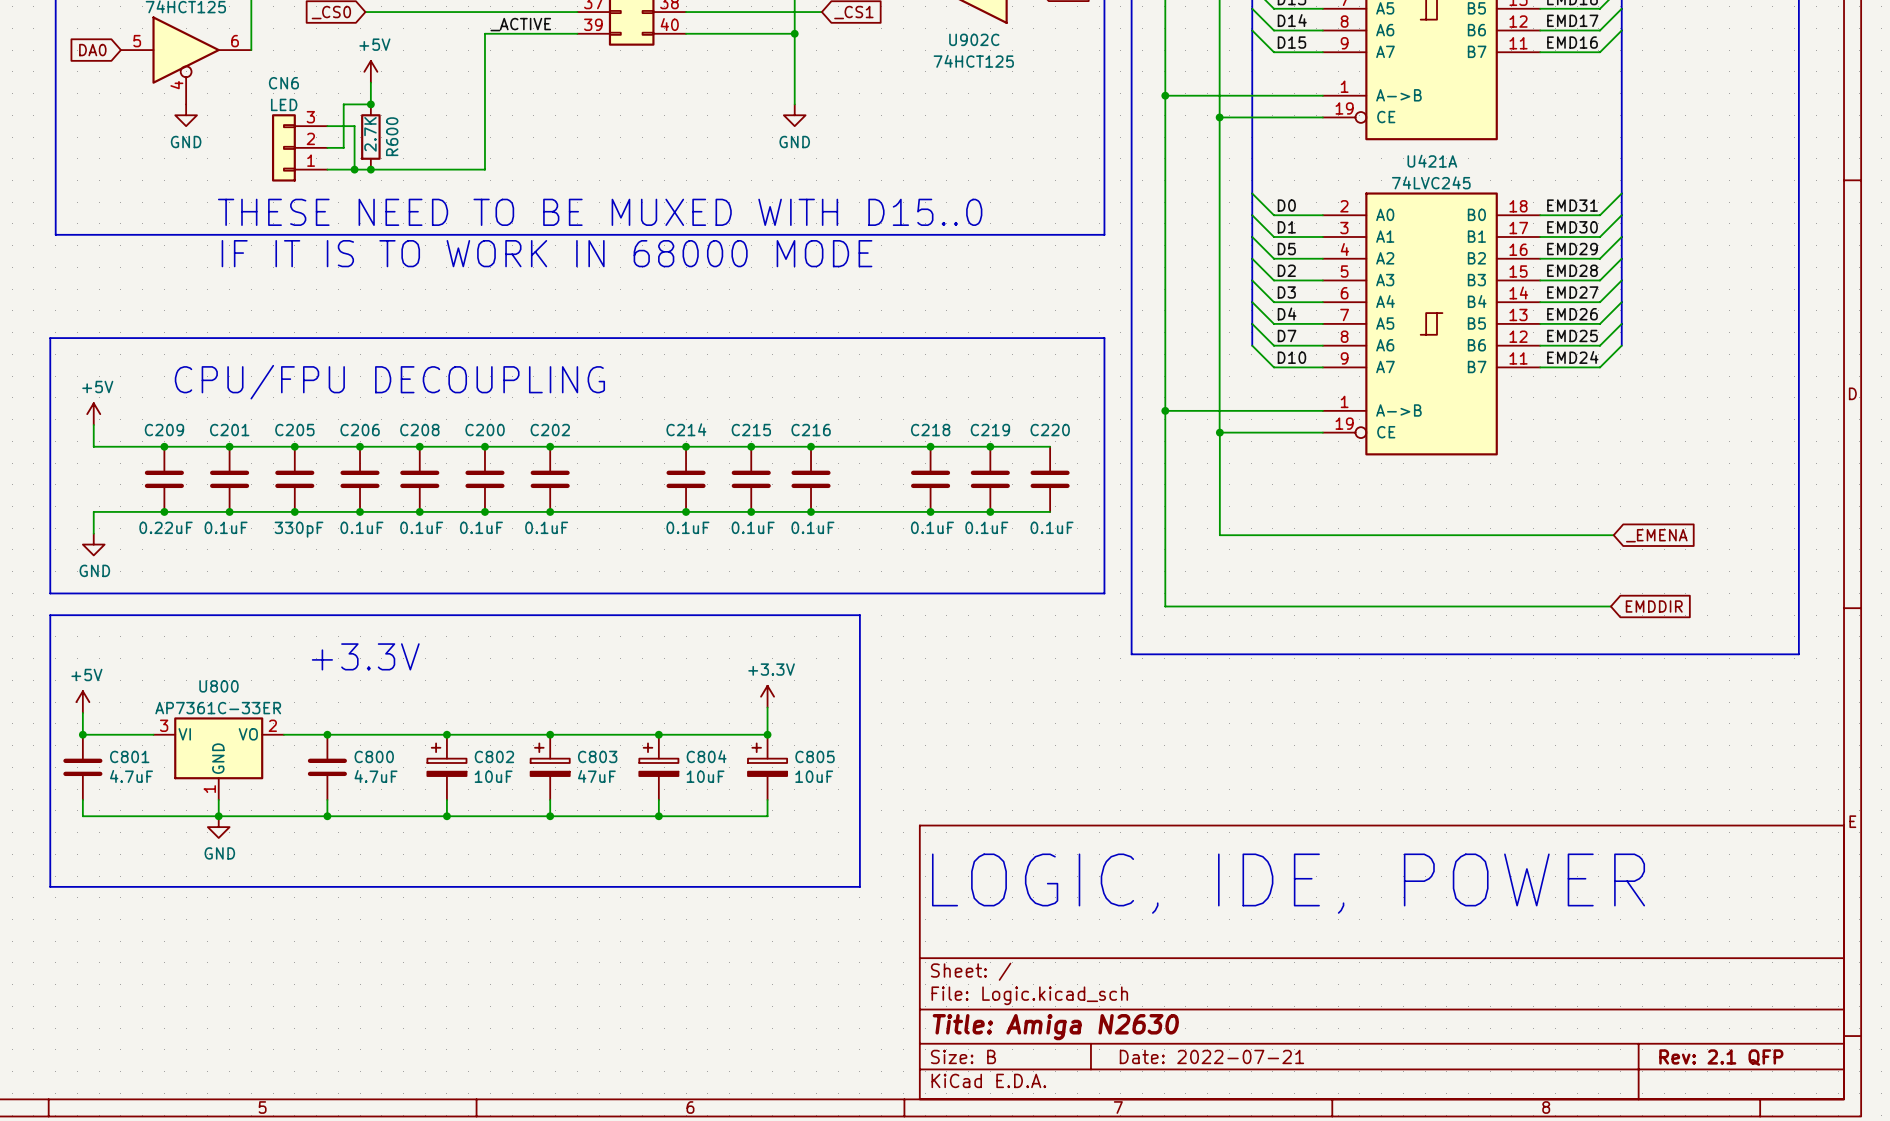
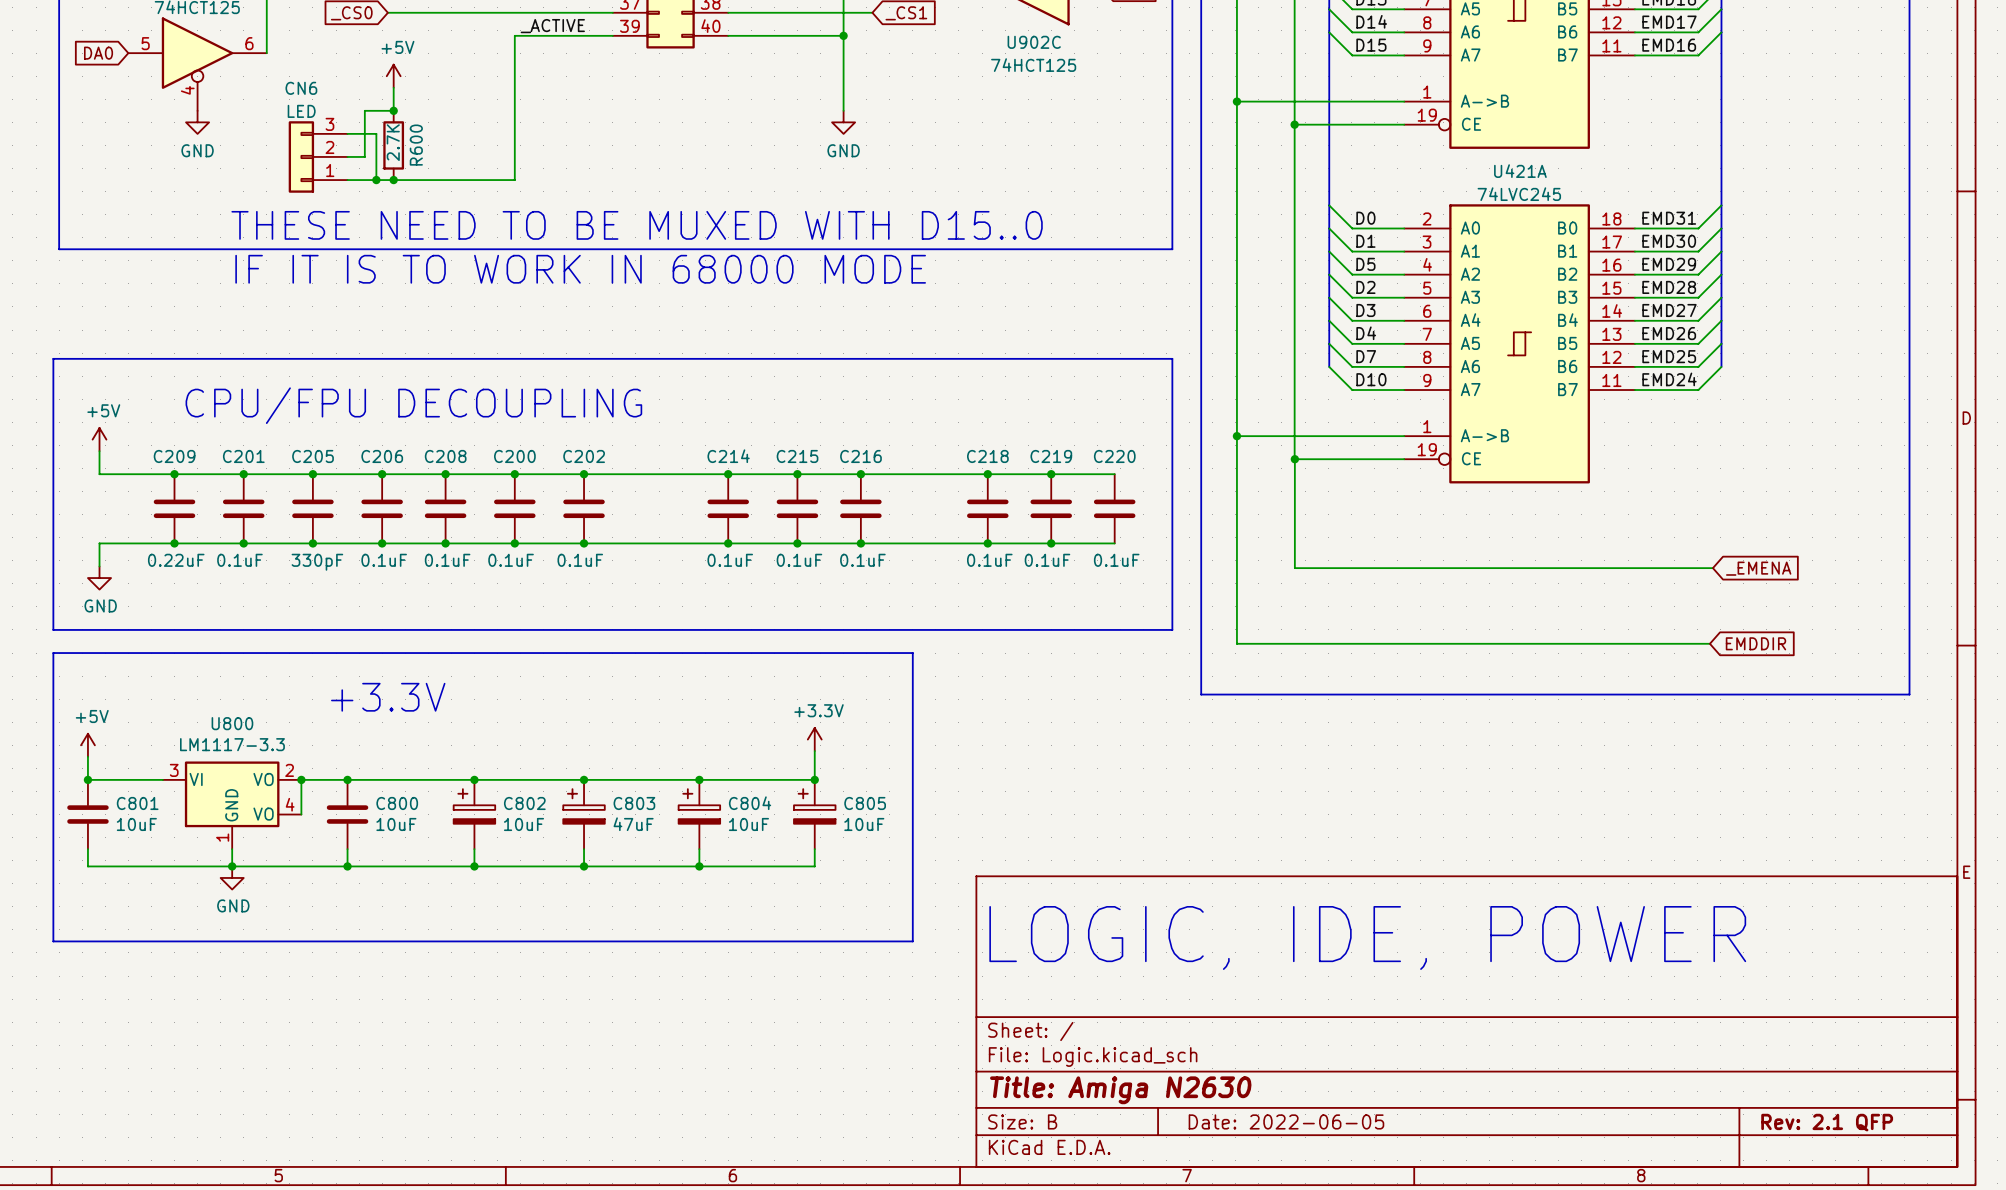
U800 value: AP7361C-33ER (218, 708) -> LM1117-3.3 (232, 744)
U800 symbol: [153, 717, 284, 800] -> [162, 761, 302, 850]
wire: none -> (301, 779) (301, 814)
junction: none -> (301, 779)
C801 value: 4.7uF (131, 776) -> 10uF (136, 824)
C800 value: 4.7uF (376, 776) -> 10uF (396, 824)
title block: Date: 2022-07-21 (1211, 1056) -> Date: 2022-06-05 (1286, 1121)

